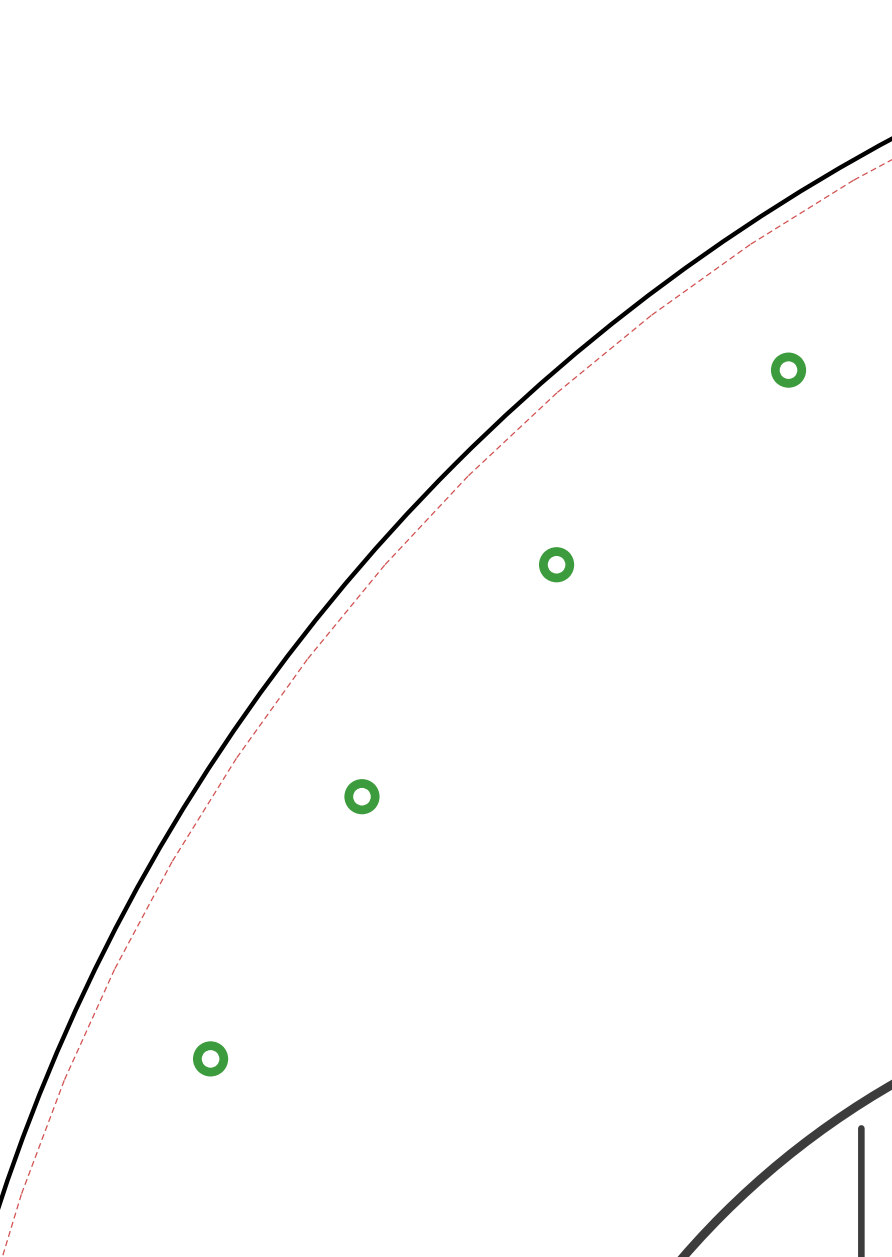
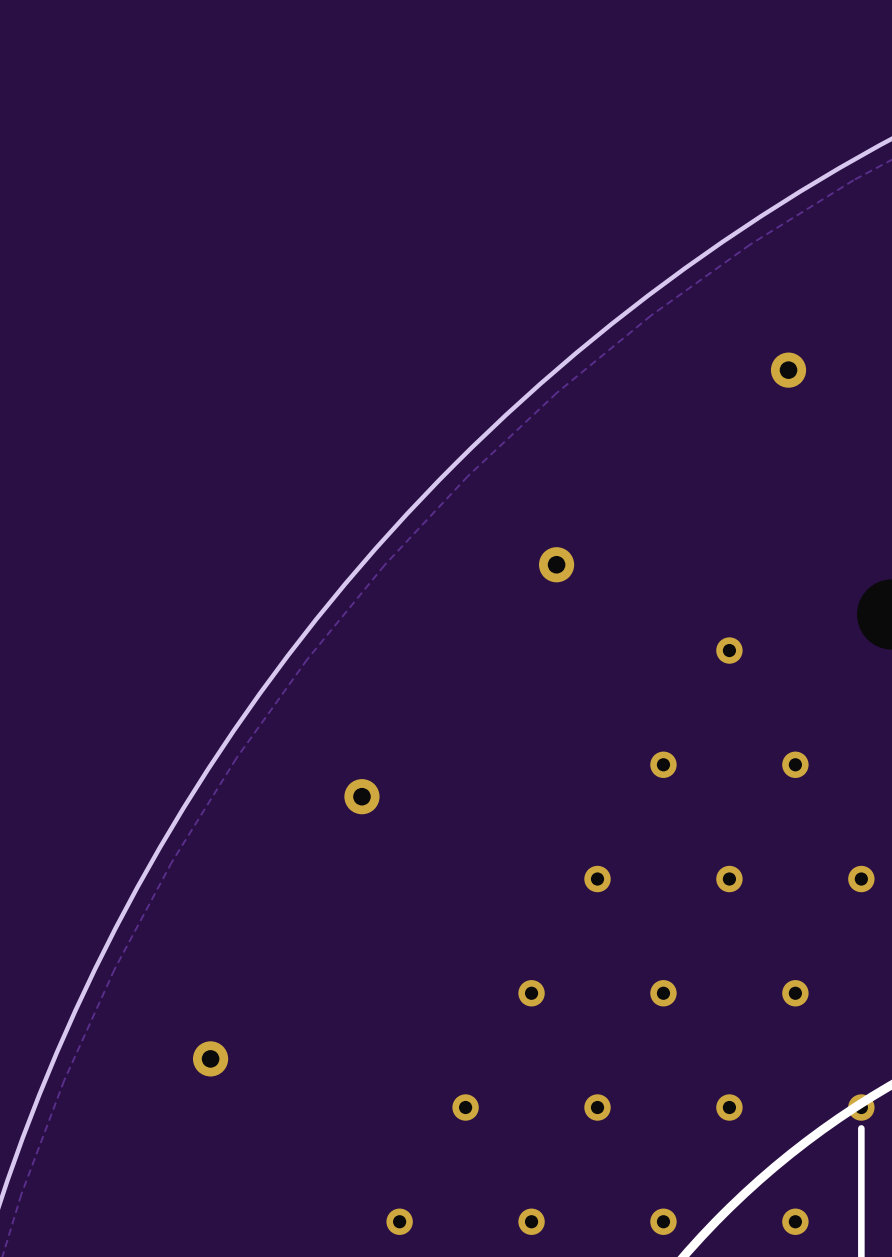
via: none -> (729, 650)
via: none -> (663, 764)
via: none -> (795, 764)
via: none -> (597, 879)
via: none -> (729, 879)
via: none -> (861, 879)
via: none -> (531, 993)
via: none -> (663, 993)
via: none -> (795, 993)
via: none -> (465, 1107)
via: none -> (597, 1107)
via: none -> (729, 1107)
via: none -> (861, 1107)
via: none -> (399, 1221)
via: none -> (531, 1221)
via: none -> (663, 1221)
via: none -> (795, 1221)

